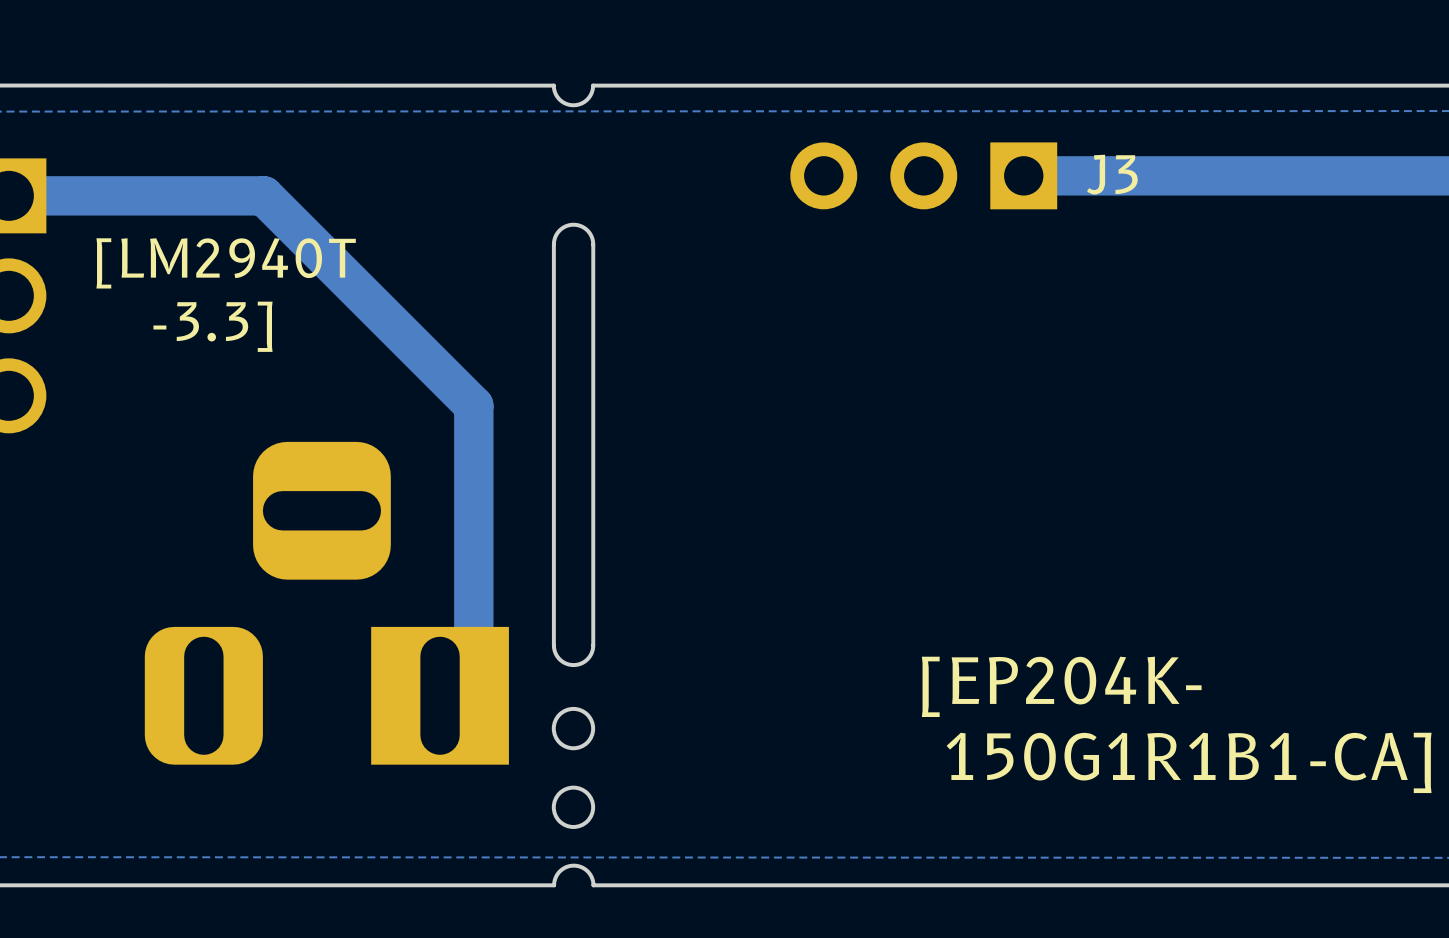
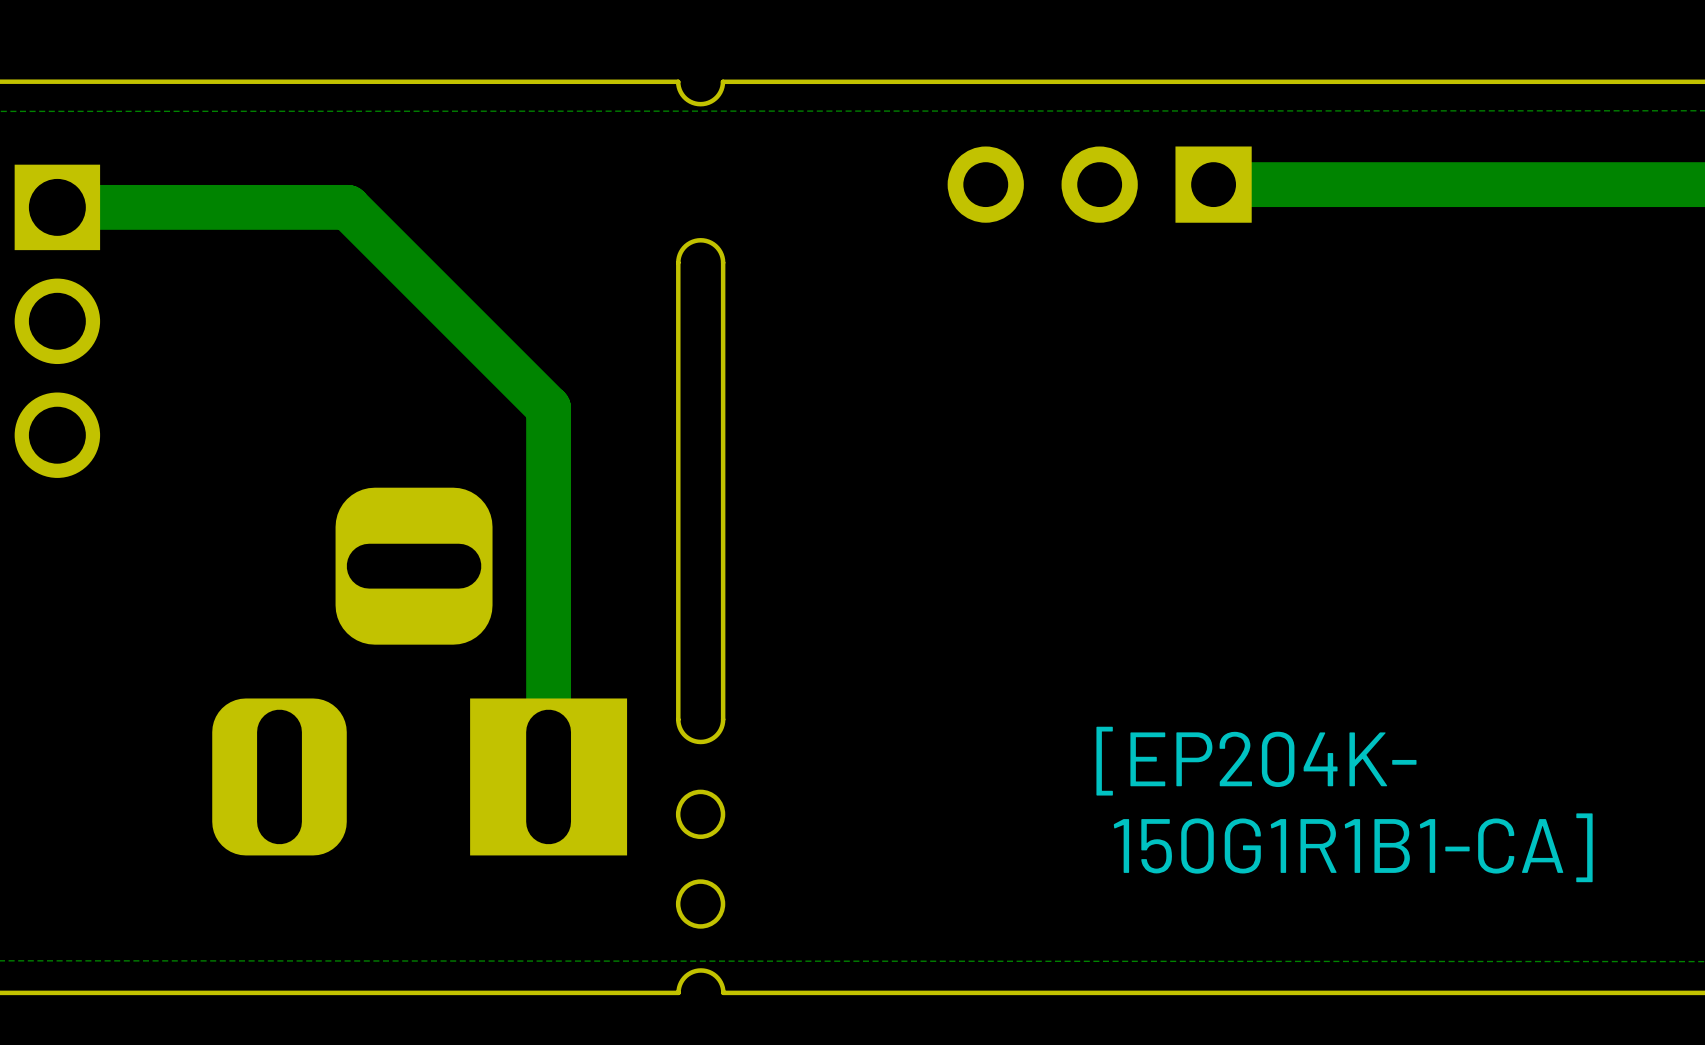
J3 name: J3 (1112, 174) -> none
text: [LM2940T (226, 263) -> none
text: -3.3] (213, 326) -> none
track: (440, 372) (473, 405) (473, 662) (440, 695) -> (548, 408) (548, 776)

